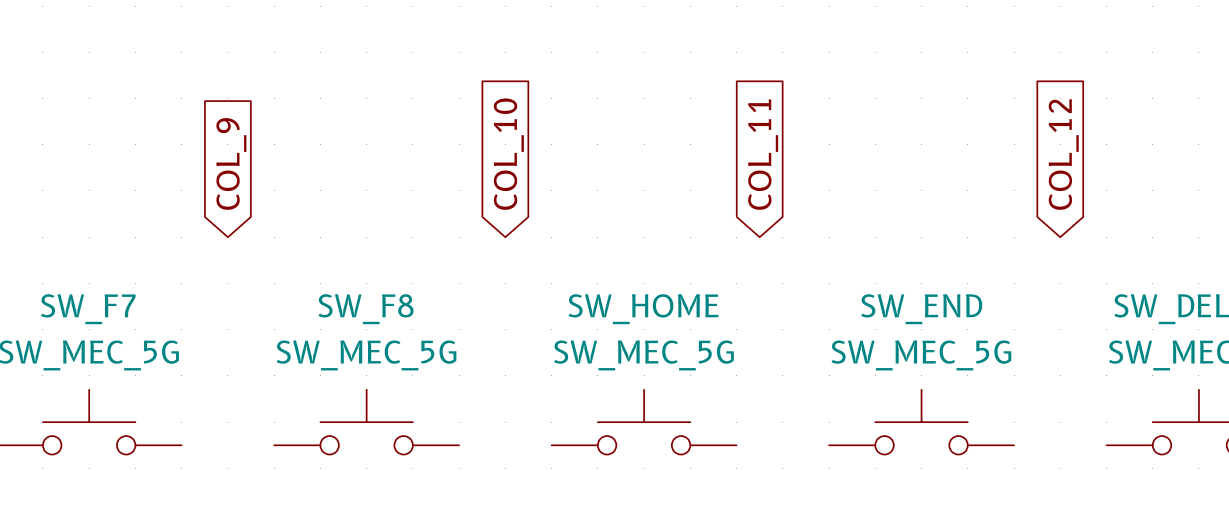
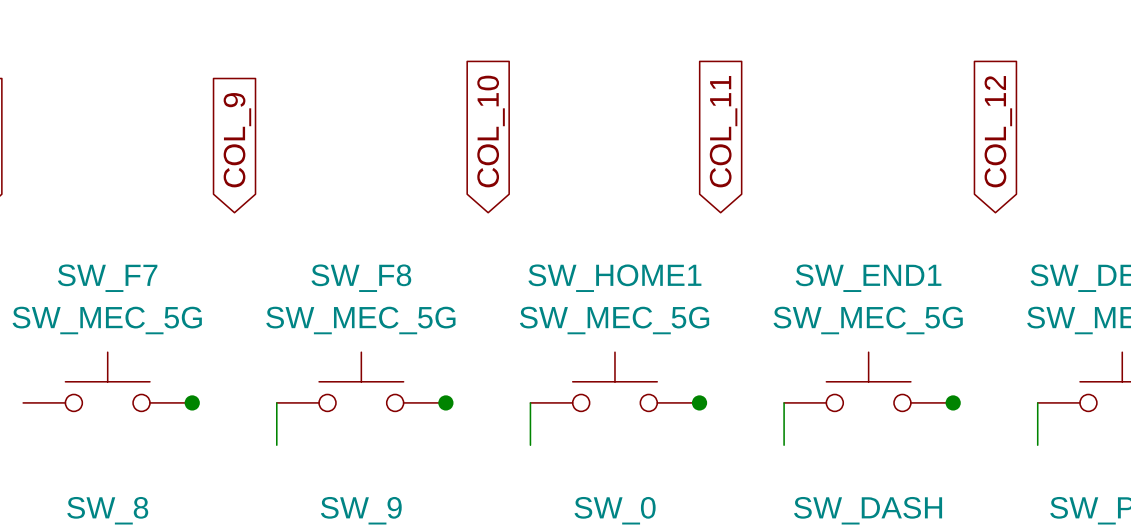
SW_HOME name: SW_HOME (643, 309) -> SW_HOME1 (614, 278)
SW_END name: SW_END (921, 309) -> SW_END1 (868, 278)
junction: none -> (192, 402)
wire: none -> (276, 402) (276, 445)
junction: none -> (445, 402)
wire: none -> (530, 402) (530, 445)
junction: none -> (699, 402)
wire: none -> (784, 402) (784, 445)
junction: none -> (953, 402)
wire: none -> (1037, 402) (1037, 445)

